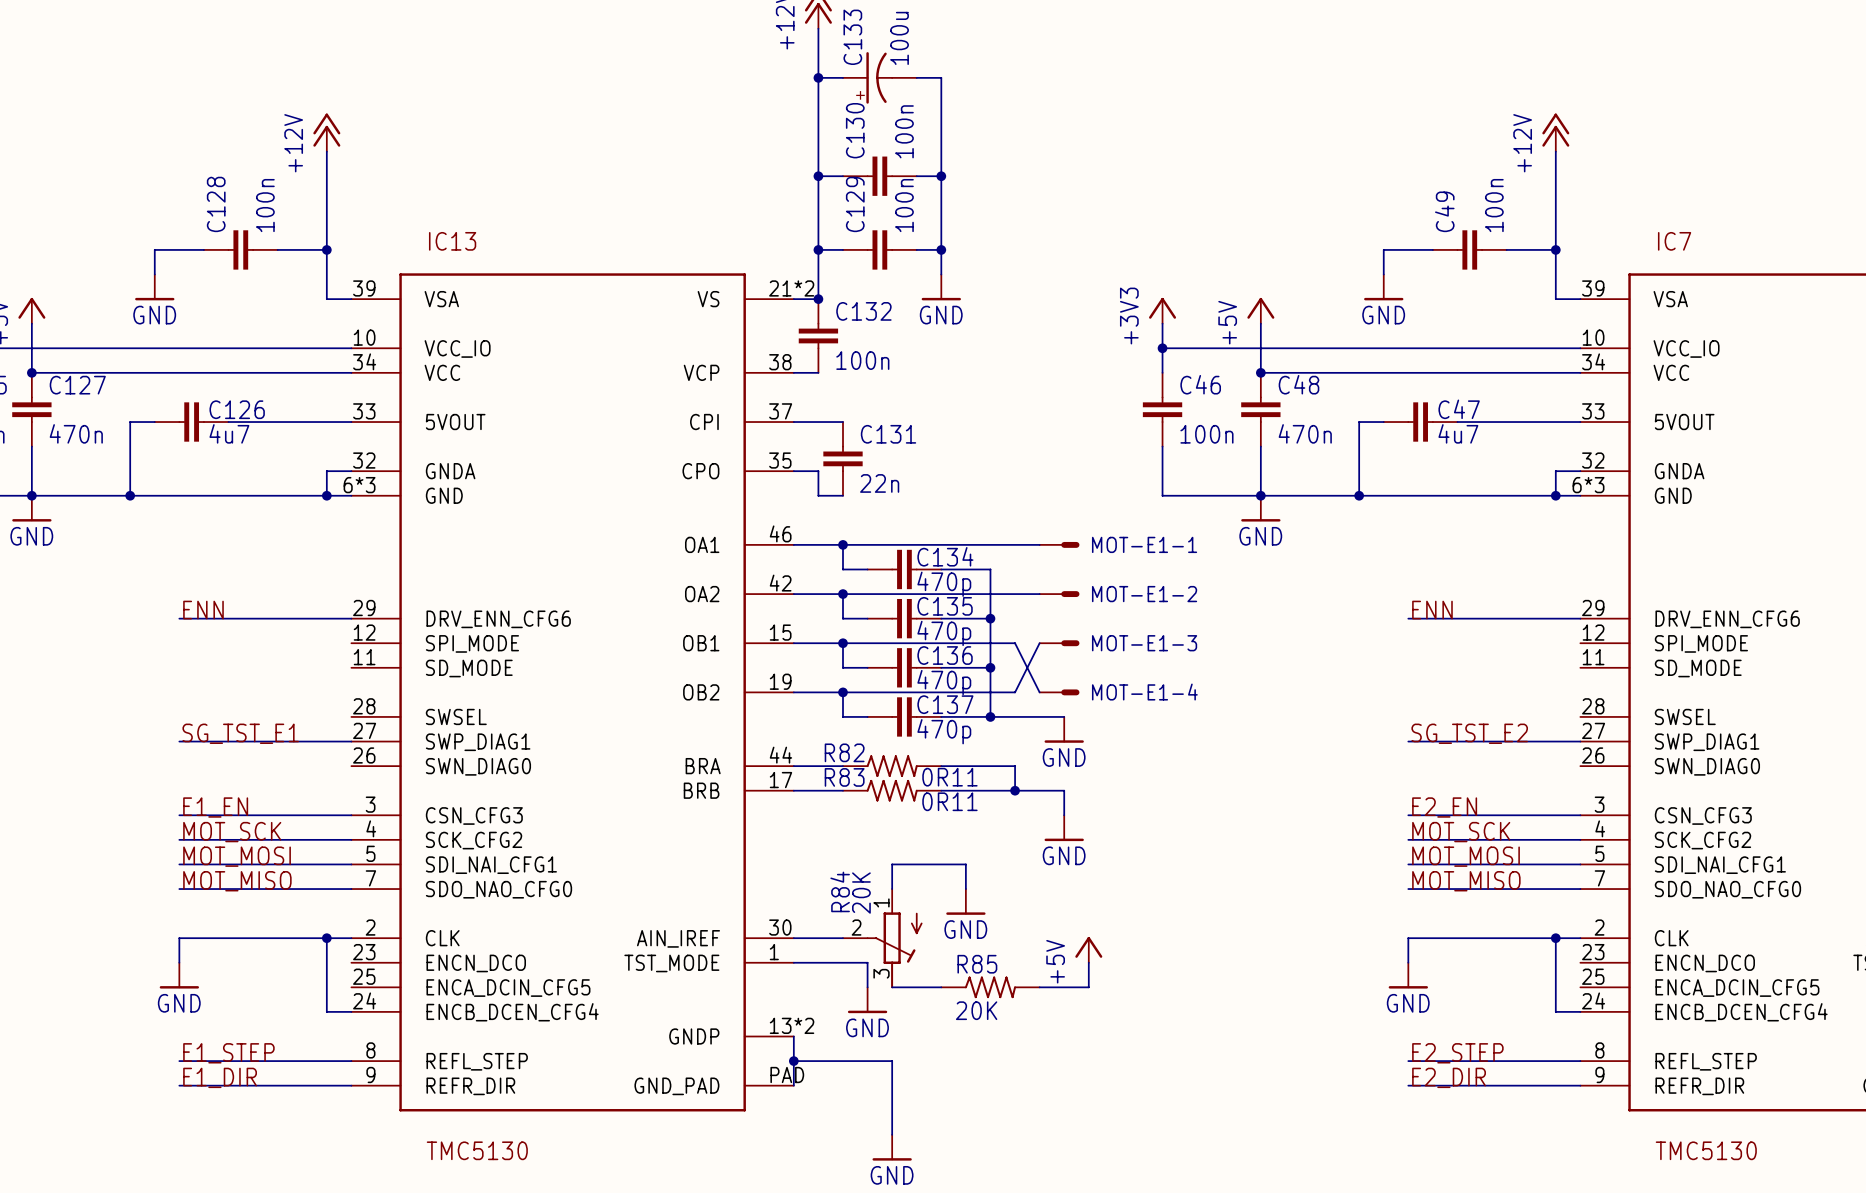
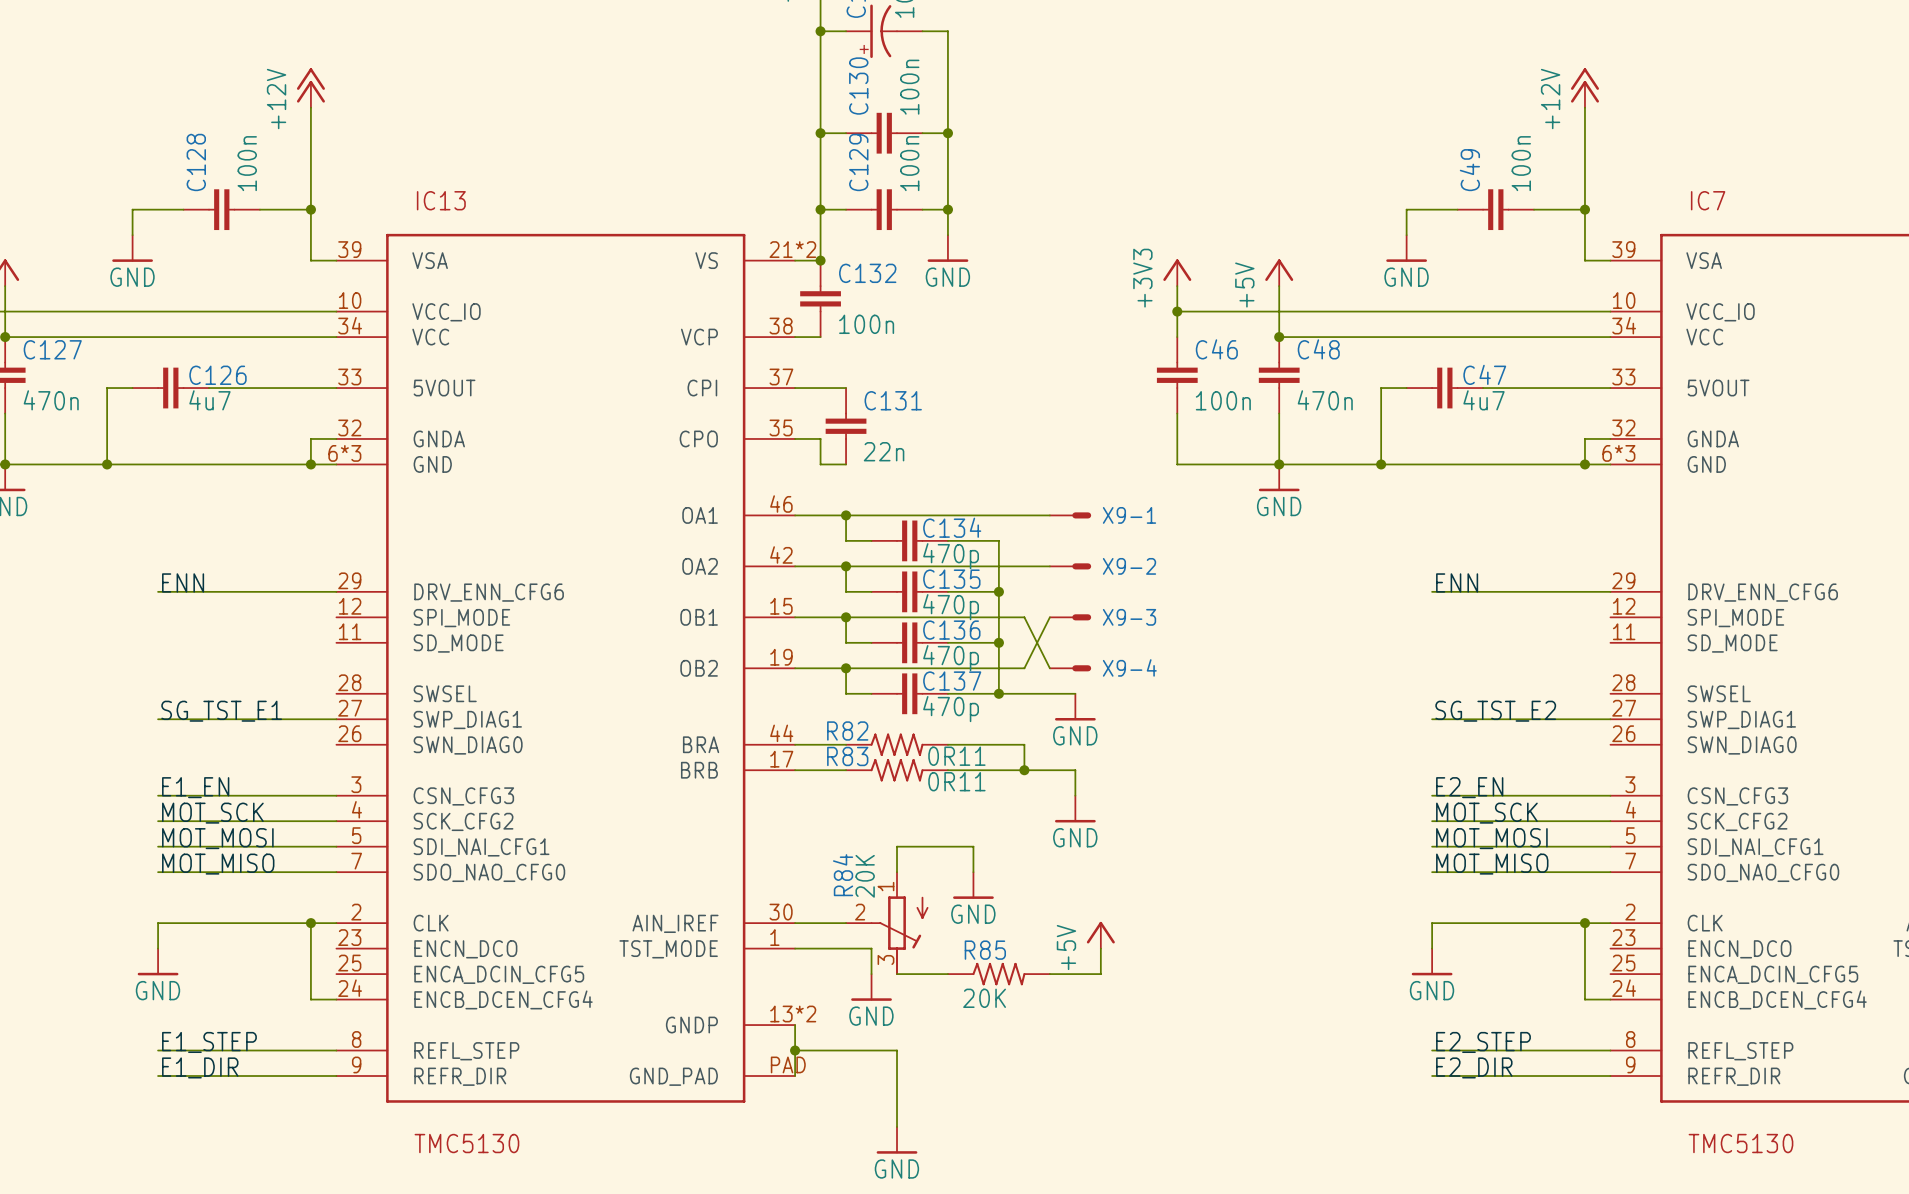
MOT-E1-1 name: MOT-E1-1 (1144, 544) -> X9-1 (1129, 515)
MOT-E1-2 name: MOT-E1-2 (1144, 594) -> X9-2 (1129, 566)
MOT-E1-3 name: MOT-E1-3 (1144, 643) -> X9-3 (1129, 617)
MOT-E1-4 name: MOT-E1-4 (1144, 692) -> X9-4 (1129, 667)

